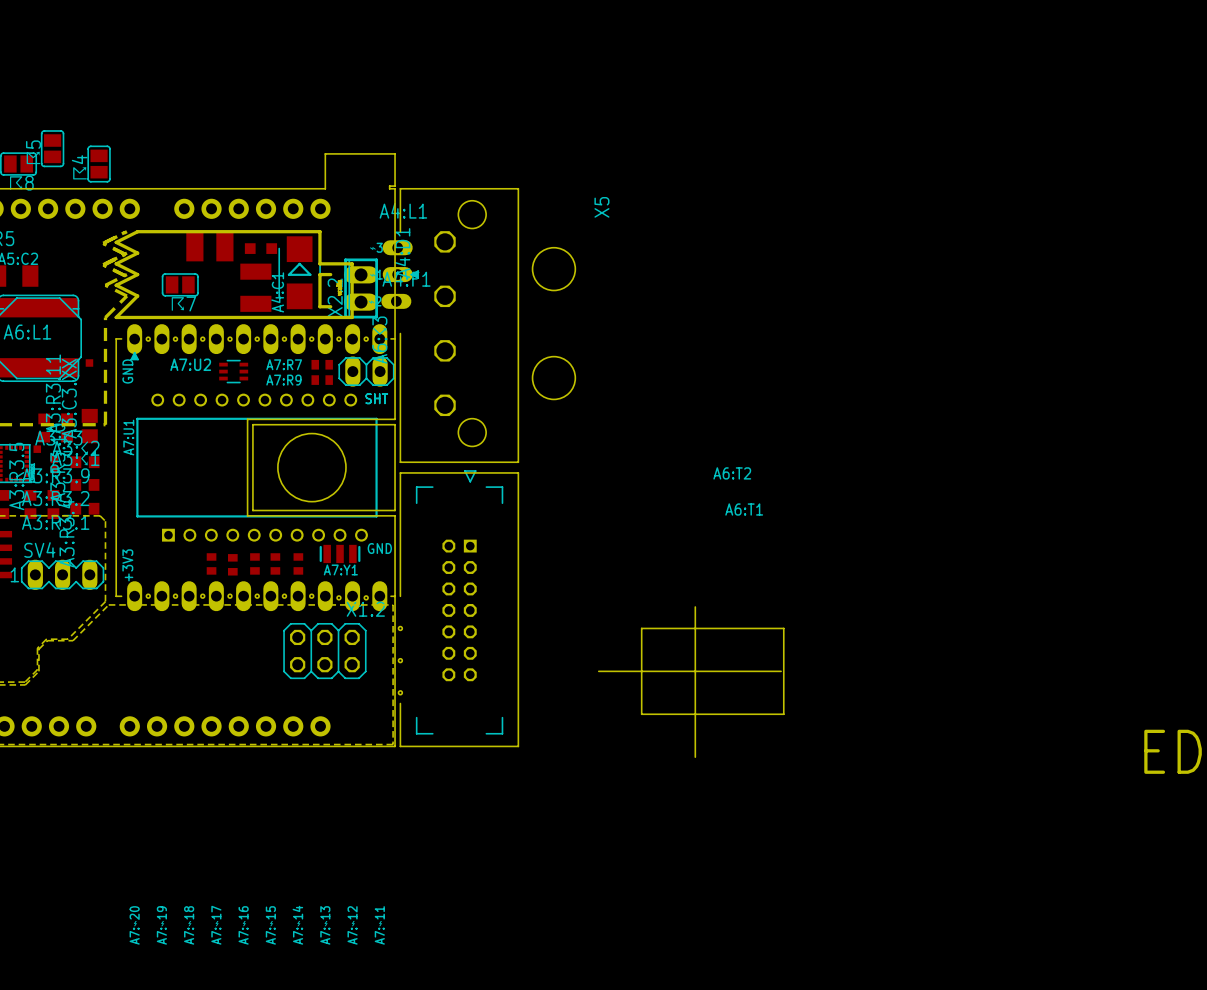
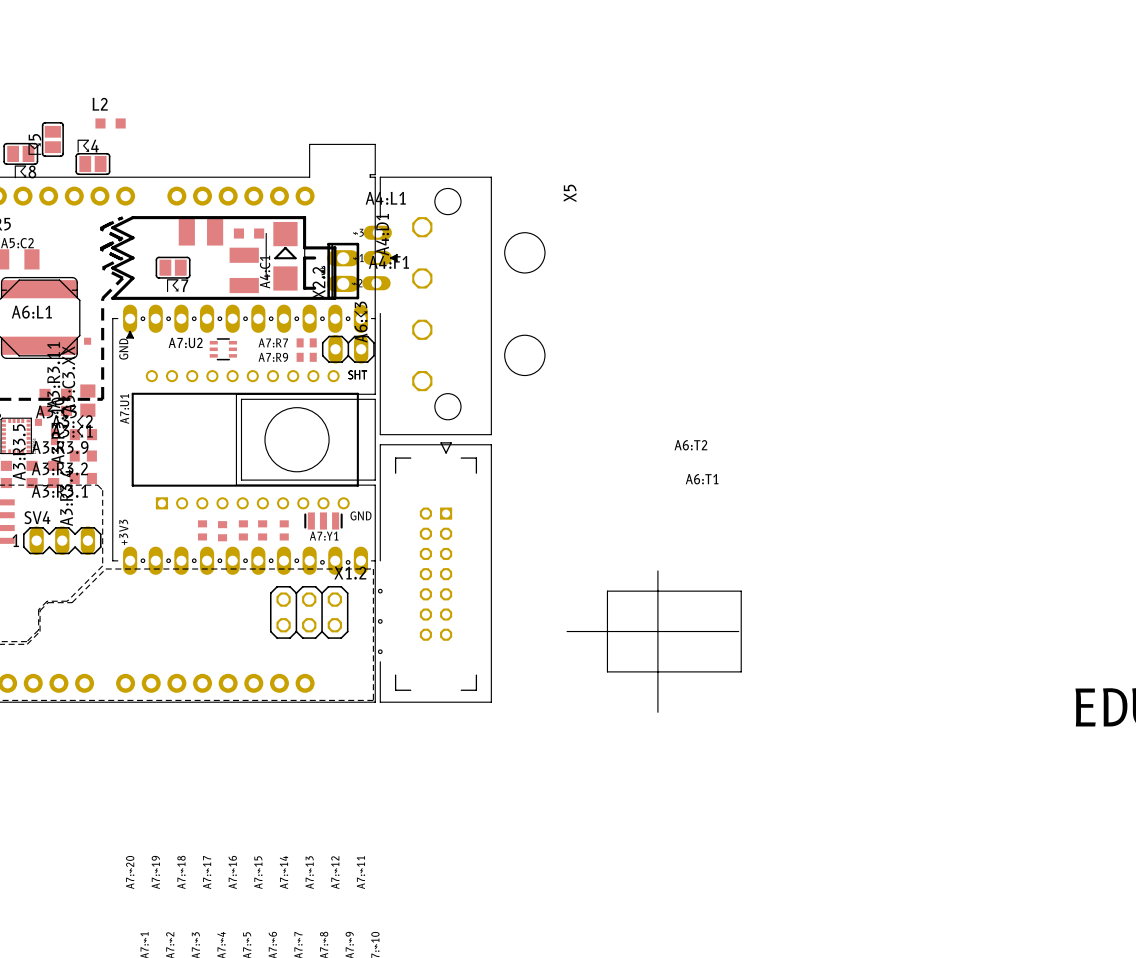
L2: none -> (110, 123)
☈4 rotation: 0° (99, 164) -> 90° clockwise (92, 164)

